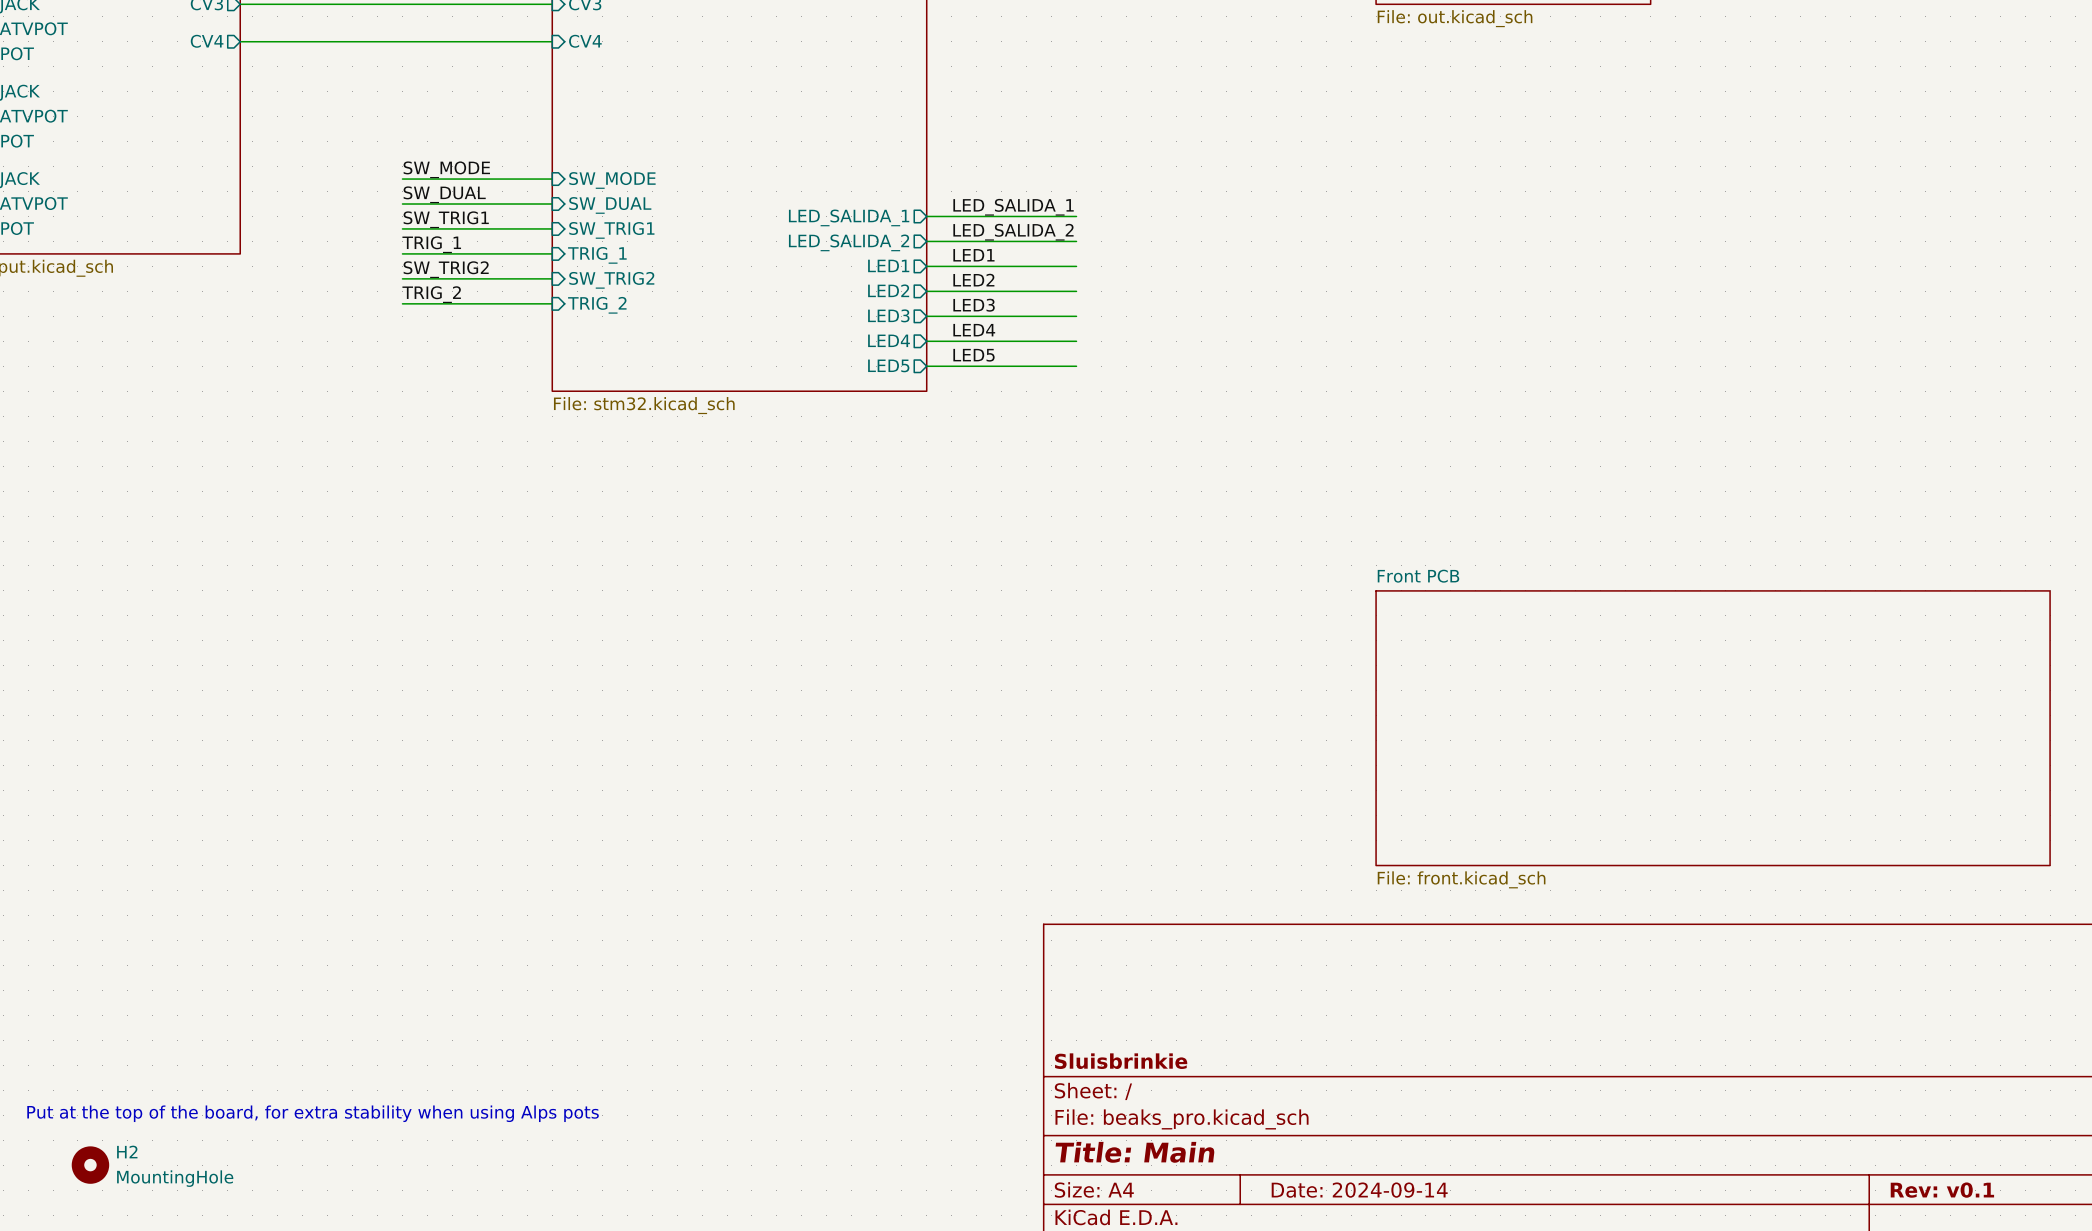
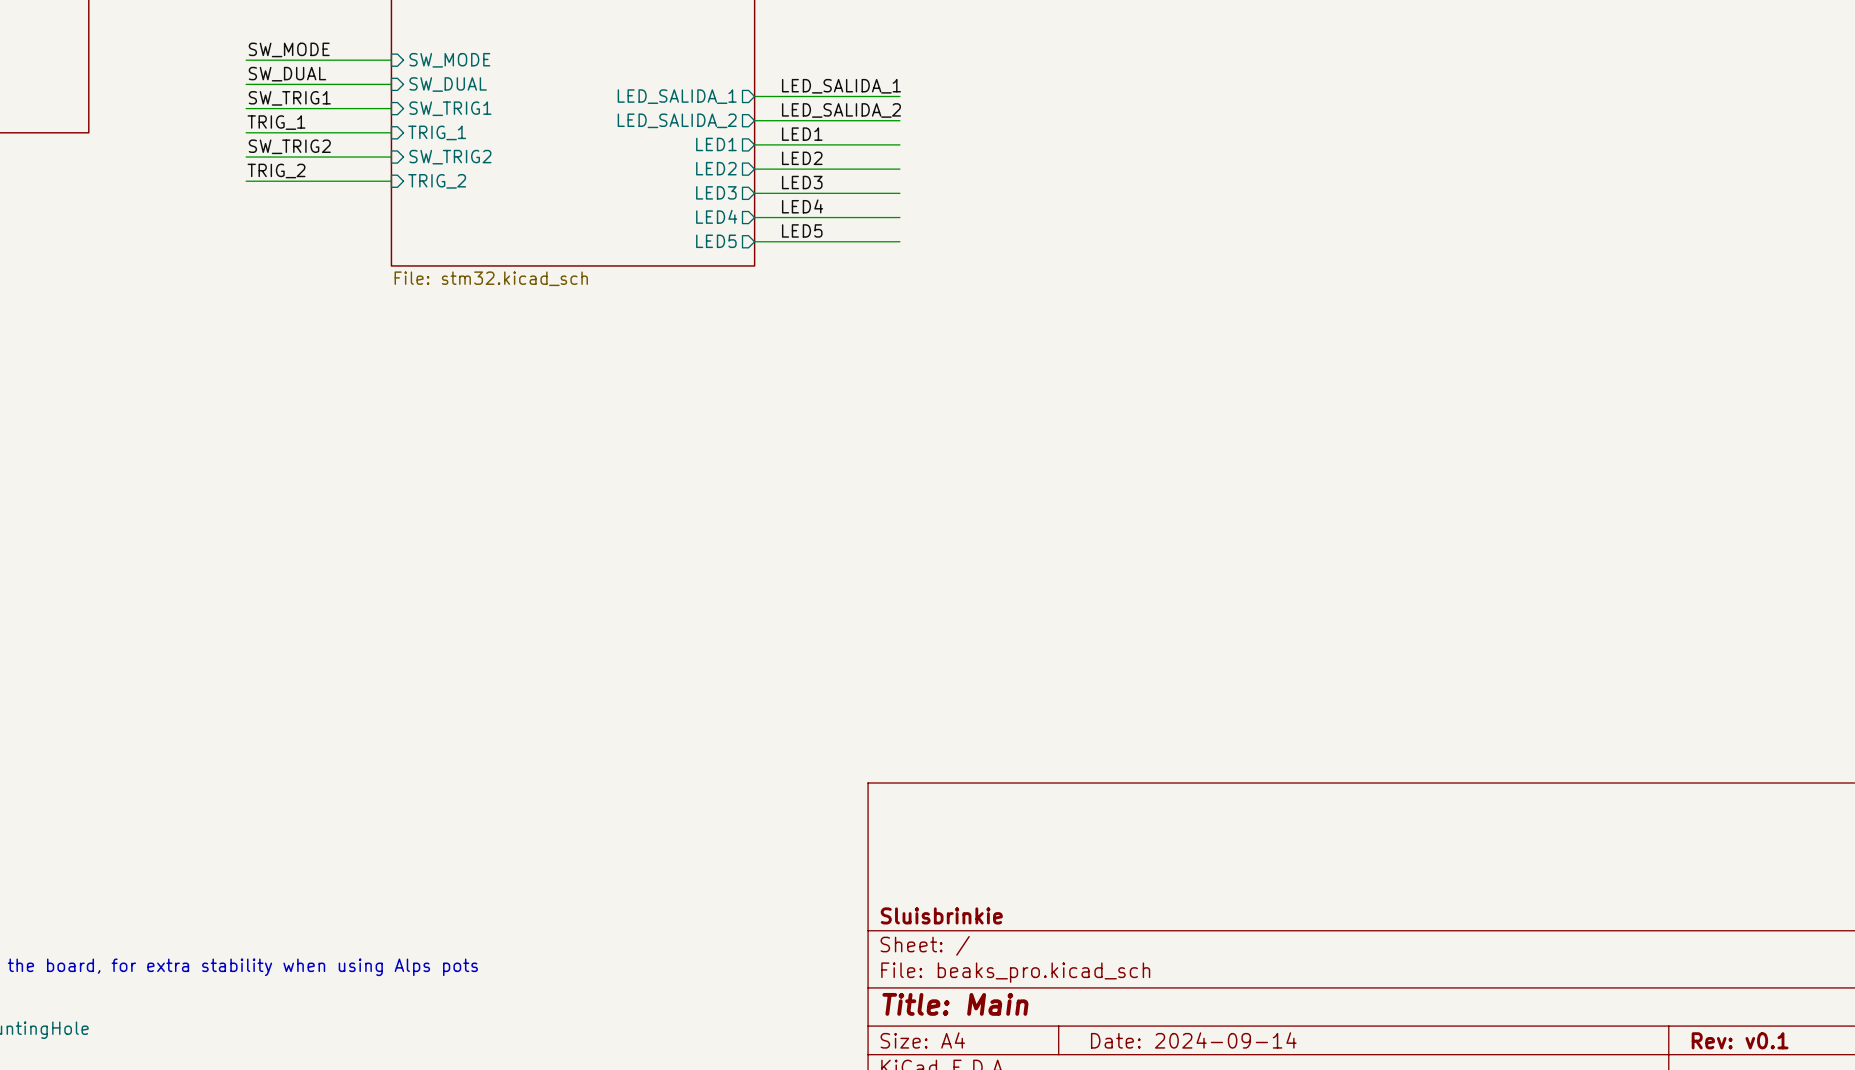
sheet Front PCB: File: front.kicad_sch (1713, 728) -> none

